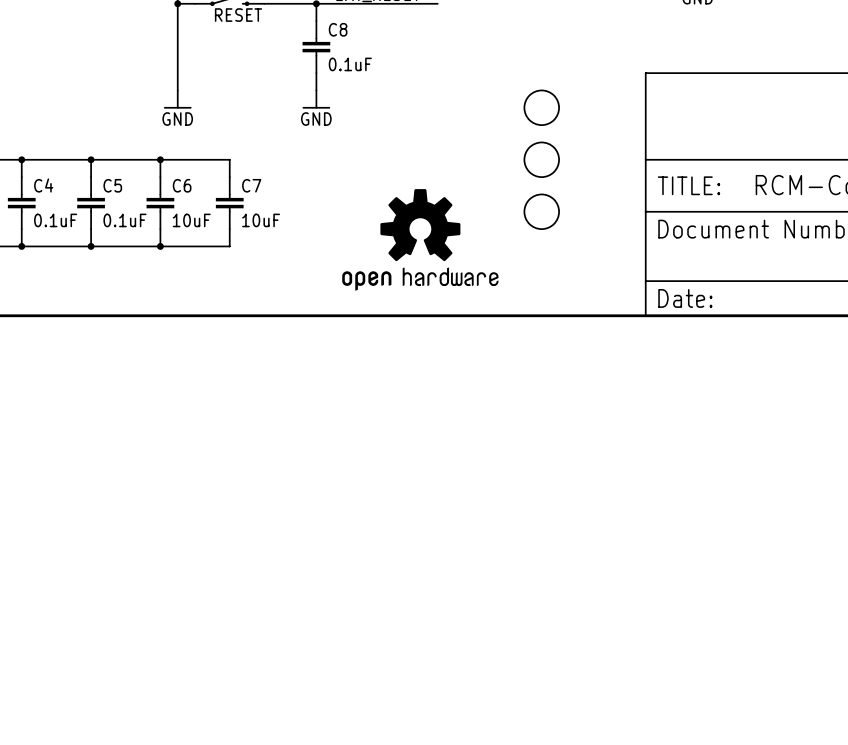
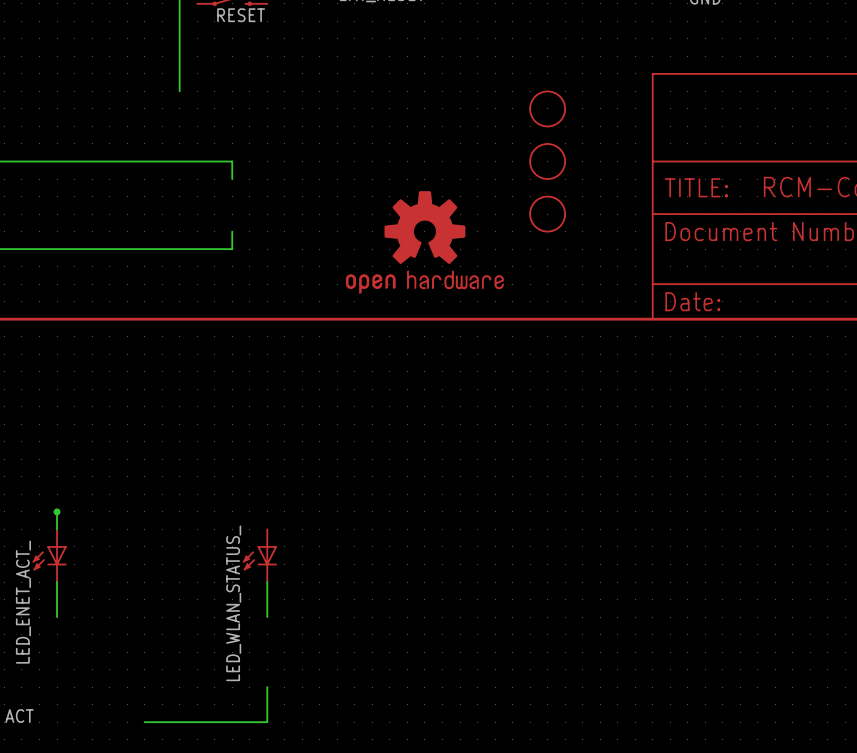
wire: (177, 3) (195, 3) -> none
junction: (177, 3) -> none
wire: (264, 3) (437, 3) -> none
wire: (316, 3) (316, 21) -> none
junction: (316, 3) -> none
C8: 0.1uF (316, 47) -> none
wire: (316, 73) (316, 90) -> none
power symbol: GND (177, 99) -> none
power symbol: GND (316, 99) -> none
wire: (21, 159) (21, 177) -> none
junction: (21, 159) -> none
wire: (91, 159) (91, 177) -> none
junction: (91, 159) -> none
wire: (160, 159) (160, 177) -> none
junction: (160, 159) -> none
C4: 0.1uF (21, 203) -> none
C5: 0.1uF (91, 203) -> none
C6: 10uF (160, 203) -> none
C7: 10uF (229, 203) -> none
wire: (21, 229) (21, 246) -> none
wire: (91, 229) (91, 246) -> none
wire: (160, 229) (160, 246) -> none
junction: (21, 246) -> none
junction: (91, 246) -> none
junction: (160, 246) -> none
wire: none -> (57, 511) (57, 529)
junction: none -> (57, 511)
LED_ENET_ACT_: none -> (49, 555)
LED_WLAN_STATUS_: none -> (260, 555)
wire: none -> (57, 582) (57, 617)
wire: none -> (267, 582) (267, 617)
wire: none -> (267, 687) (267, 722) (144, 722)
label: none -> ACT (19, 716)

